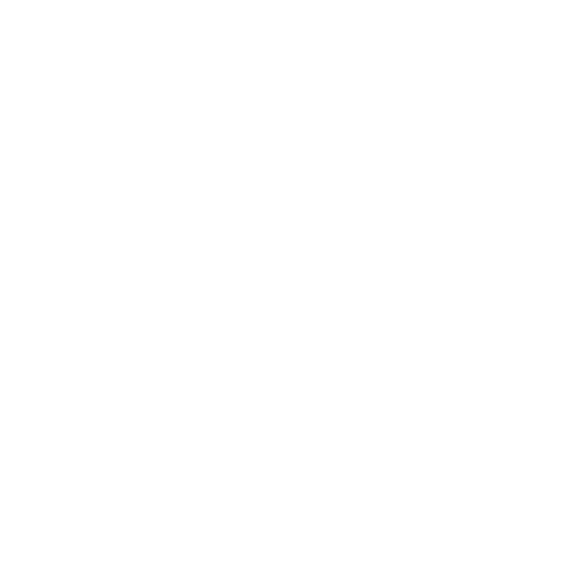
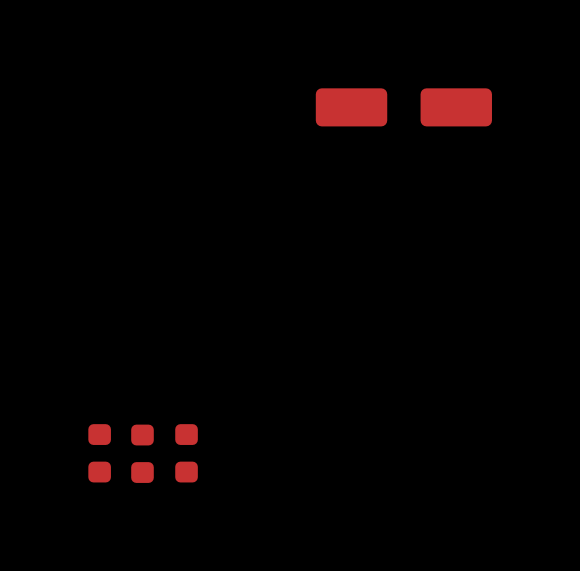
part: none -> (403, 107)
part: none -> (99, 453)
part: none -> (142, 453)
part: none -> (186, 453)

